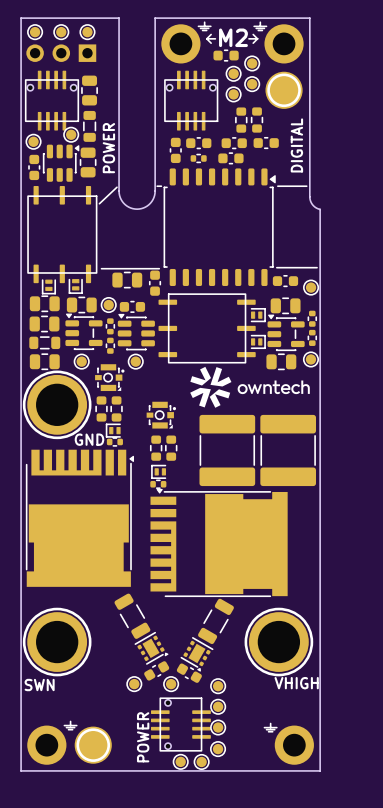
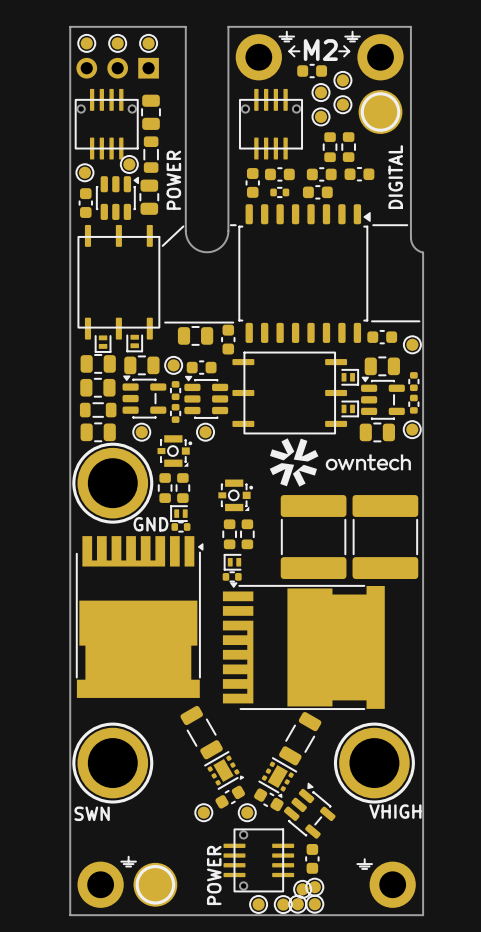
part footprint: [210, 678, 226, 695] -> [283, 782, 336, 839]
part: (218, 706) -> none
part: none -> (312, 858)
part: (218, 727) -> none
part: none -> (314, 887)
part: none -> (297, 904)
part: none -> (314, 904)

